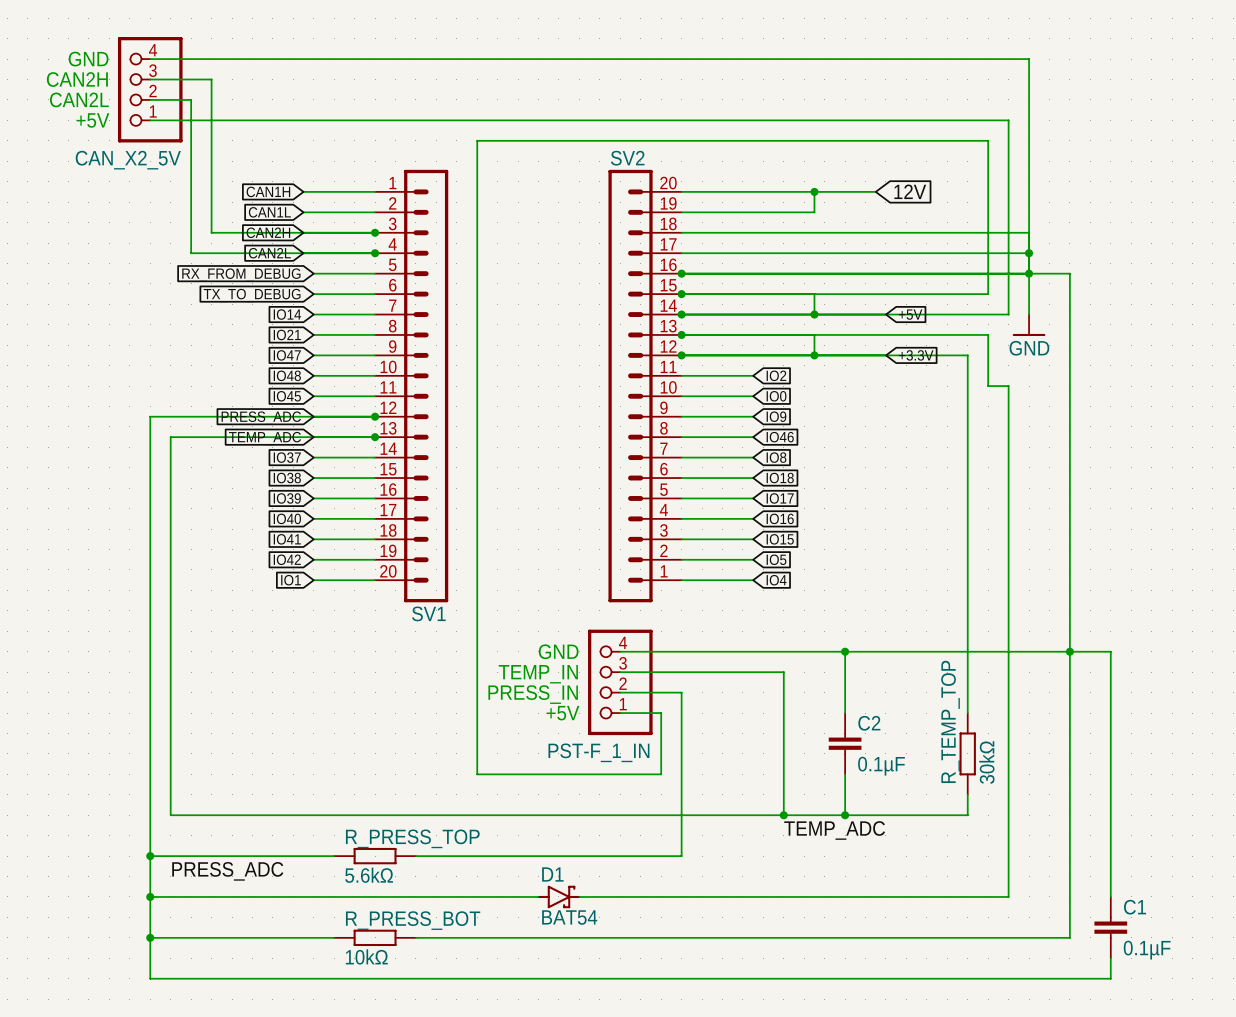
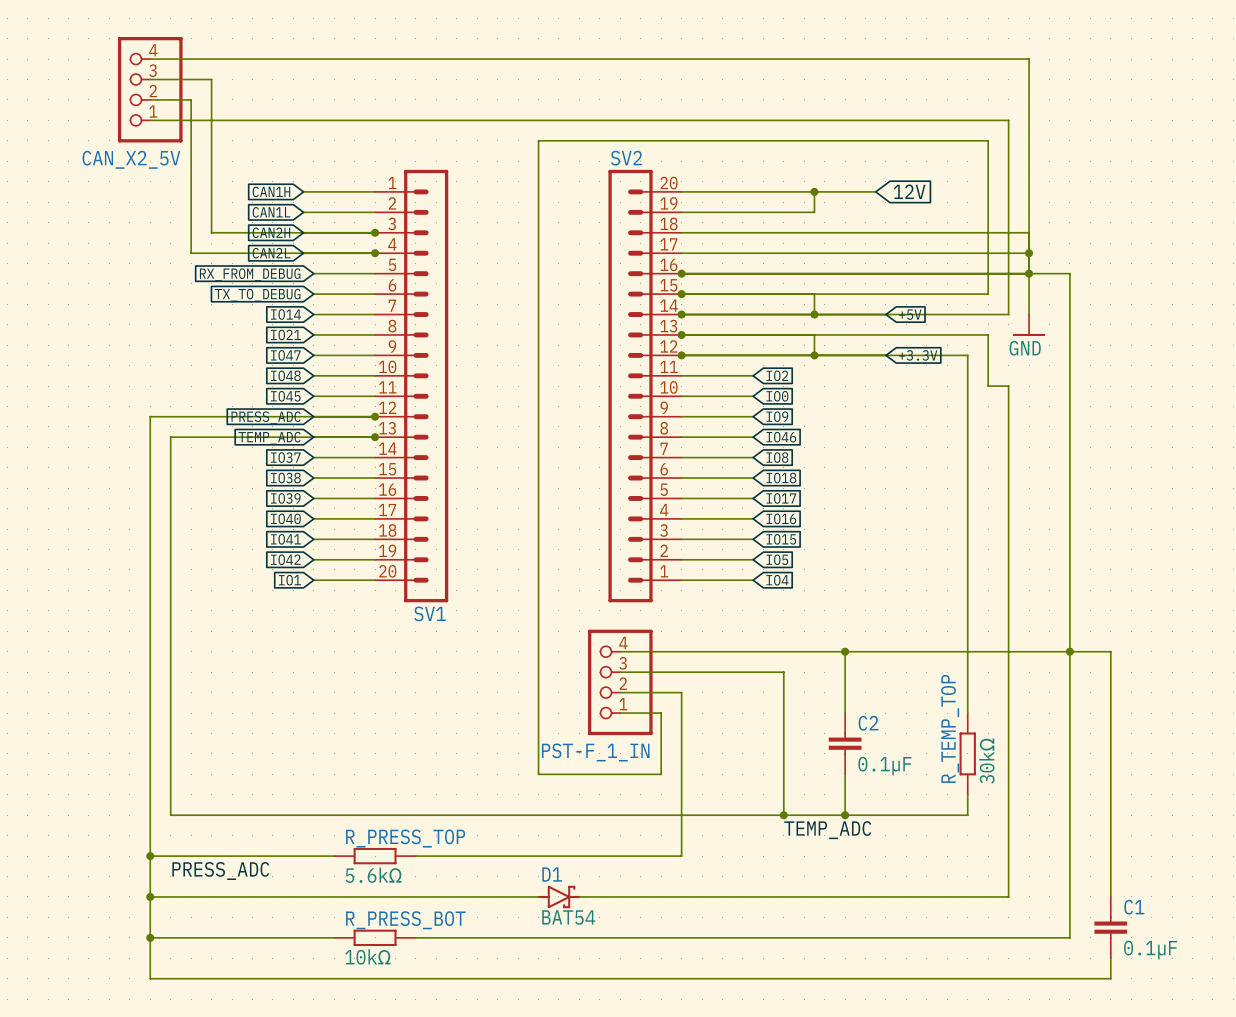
text: GND (88, 59) -> none
text: CAN2H (77, 79) -> none
text: CAN2L (79, 99) -> none
text: +5V (92, 120) -> none
wire: (538, 140) (477, 140) (477, 774) (538, 774) -> (538, 140) (538, 774)
text: GND (558, 651) -> none
text: TEMP_IN (538, 674) -> none
text: PRESS_IN (533, 694) -> none
text: +5V (562, 713) -> none

